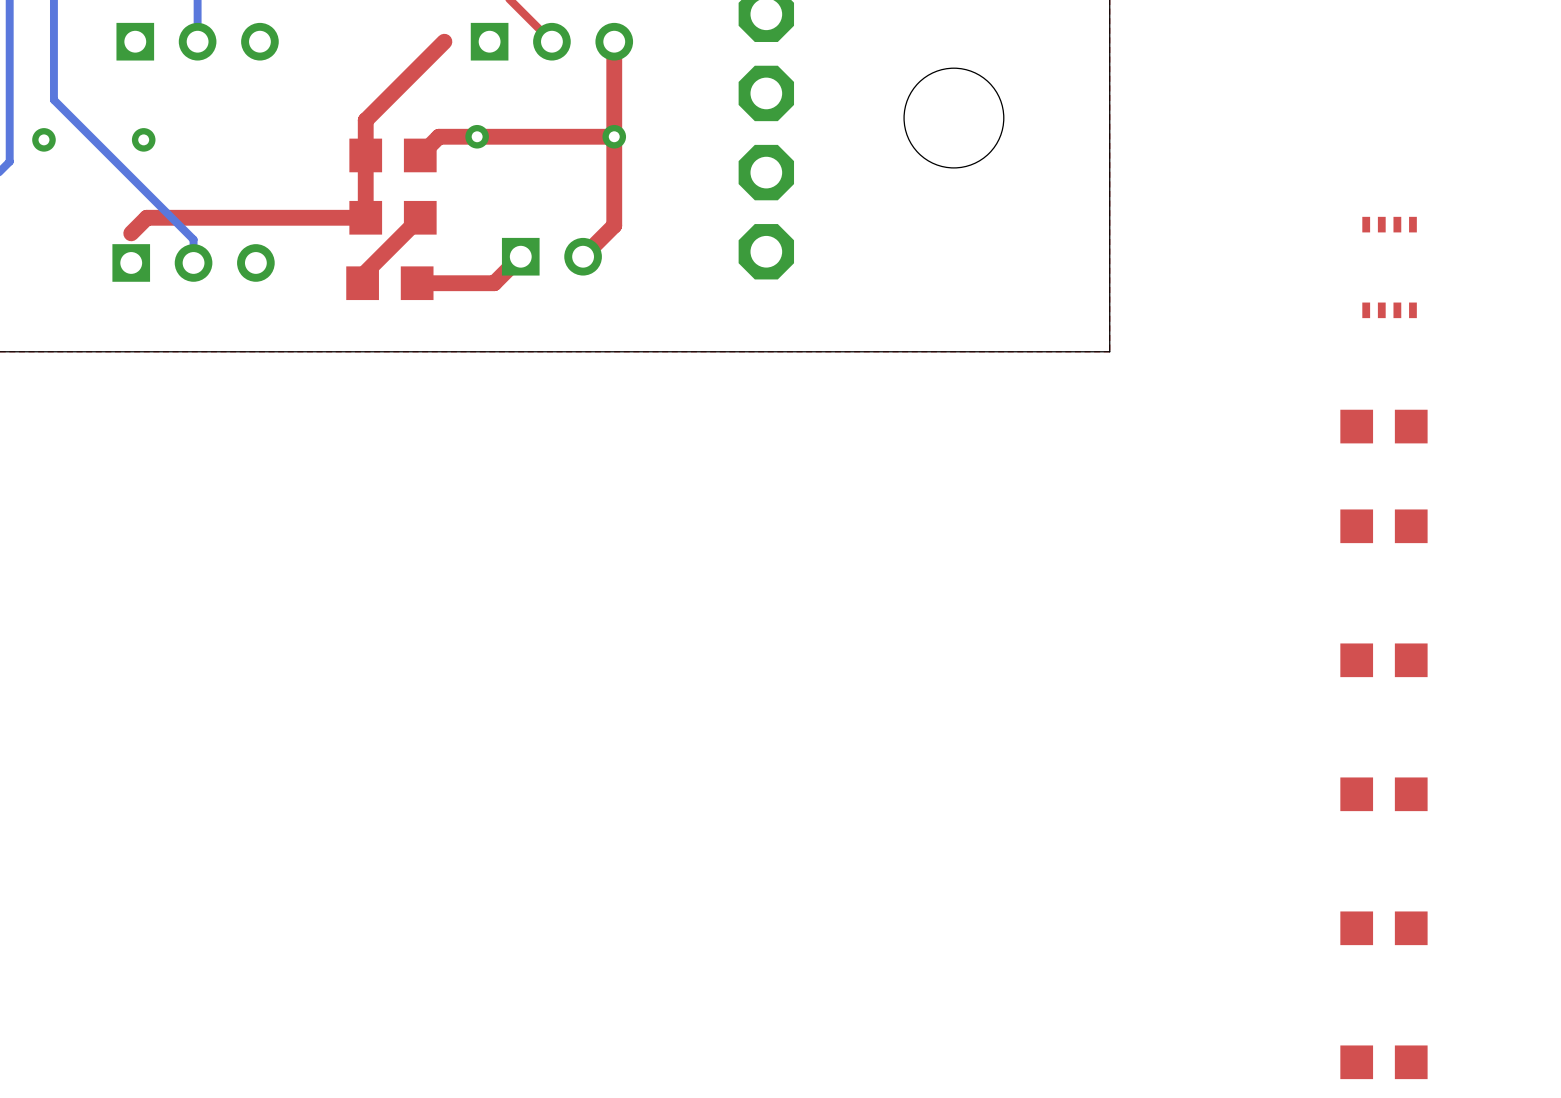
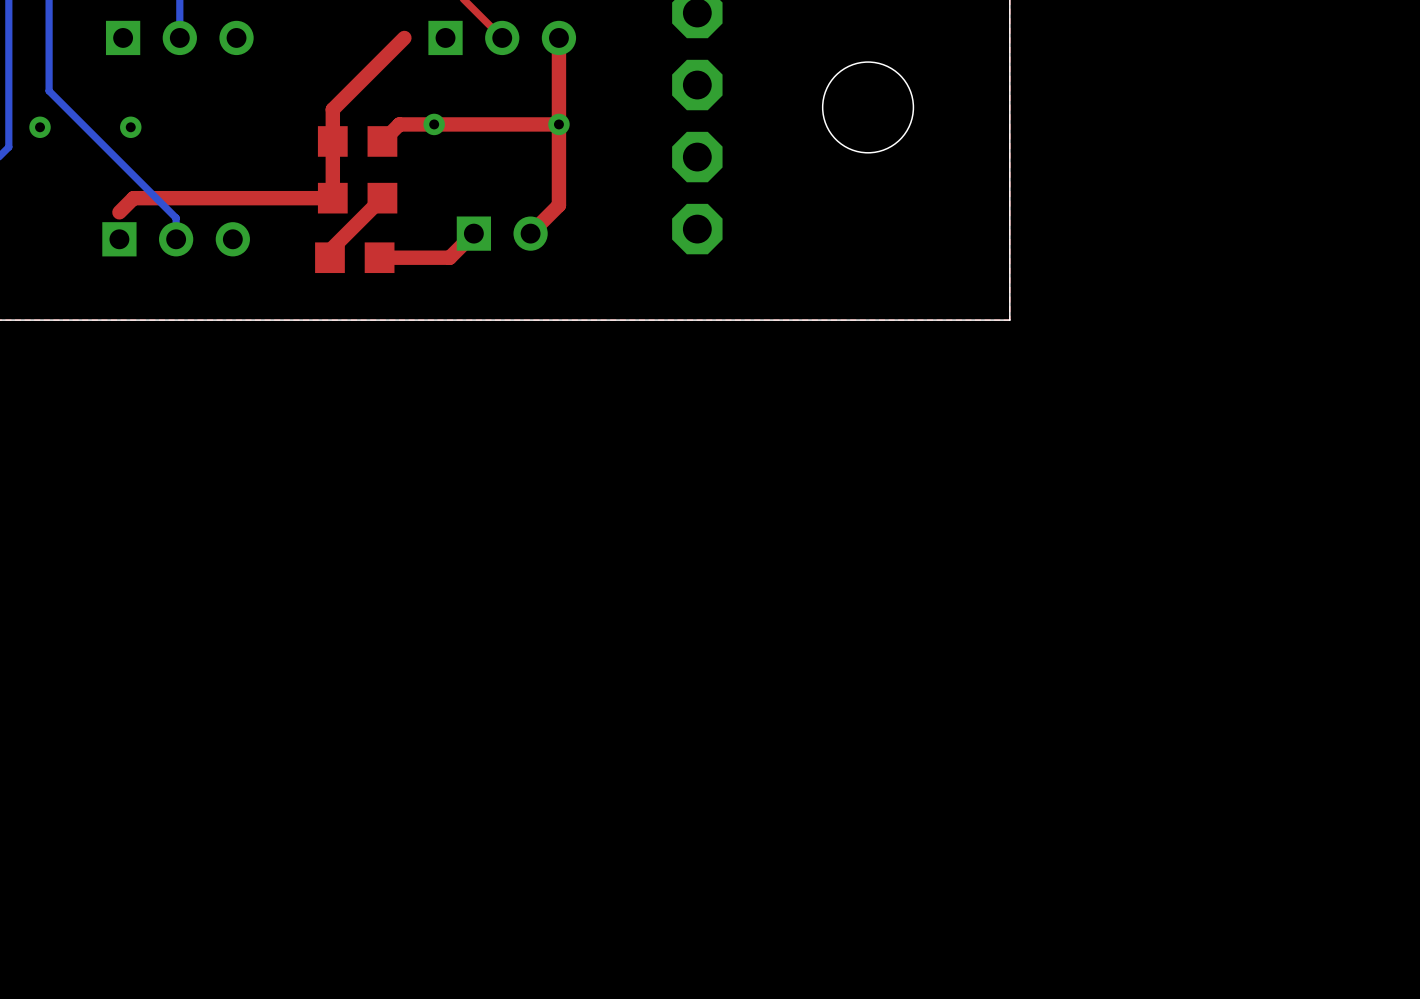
part: (1389, 267) -> none
part: (1383, 426) -> none
part: (1383, 526) -> none
part: (1383, 660) -> none
part: (1383, 794) -> none
part: (1383, 928) -> none
part: (1383, 1062) -> none

